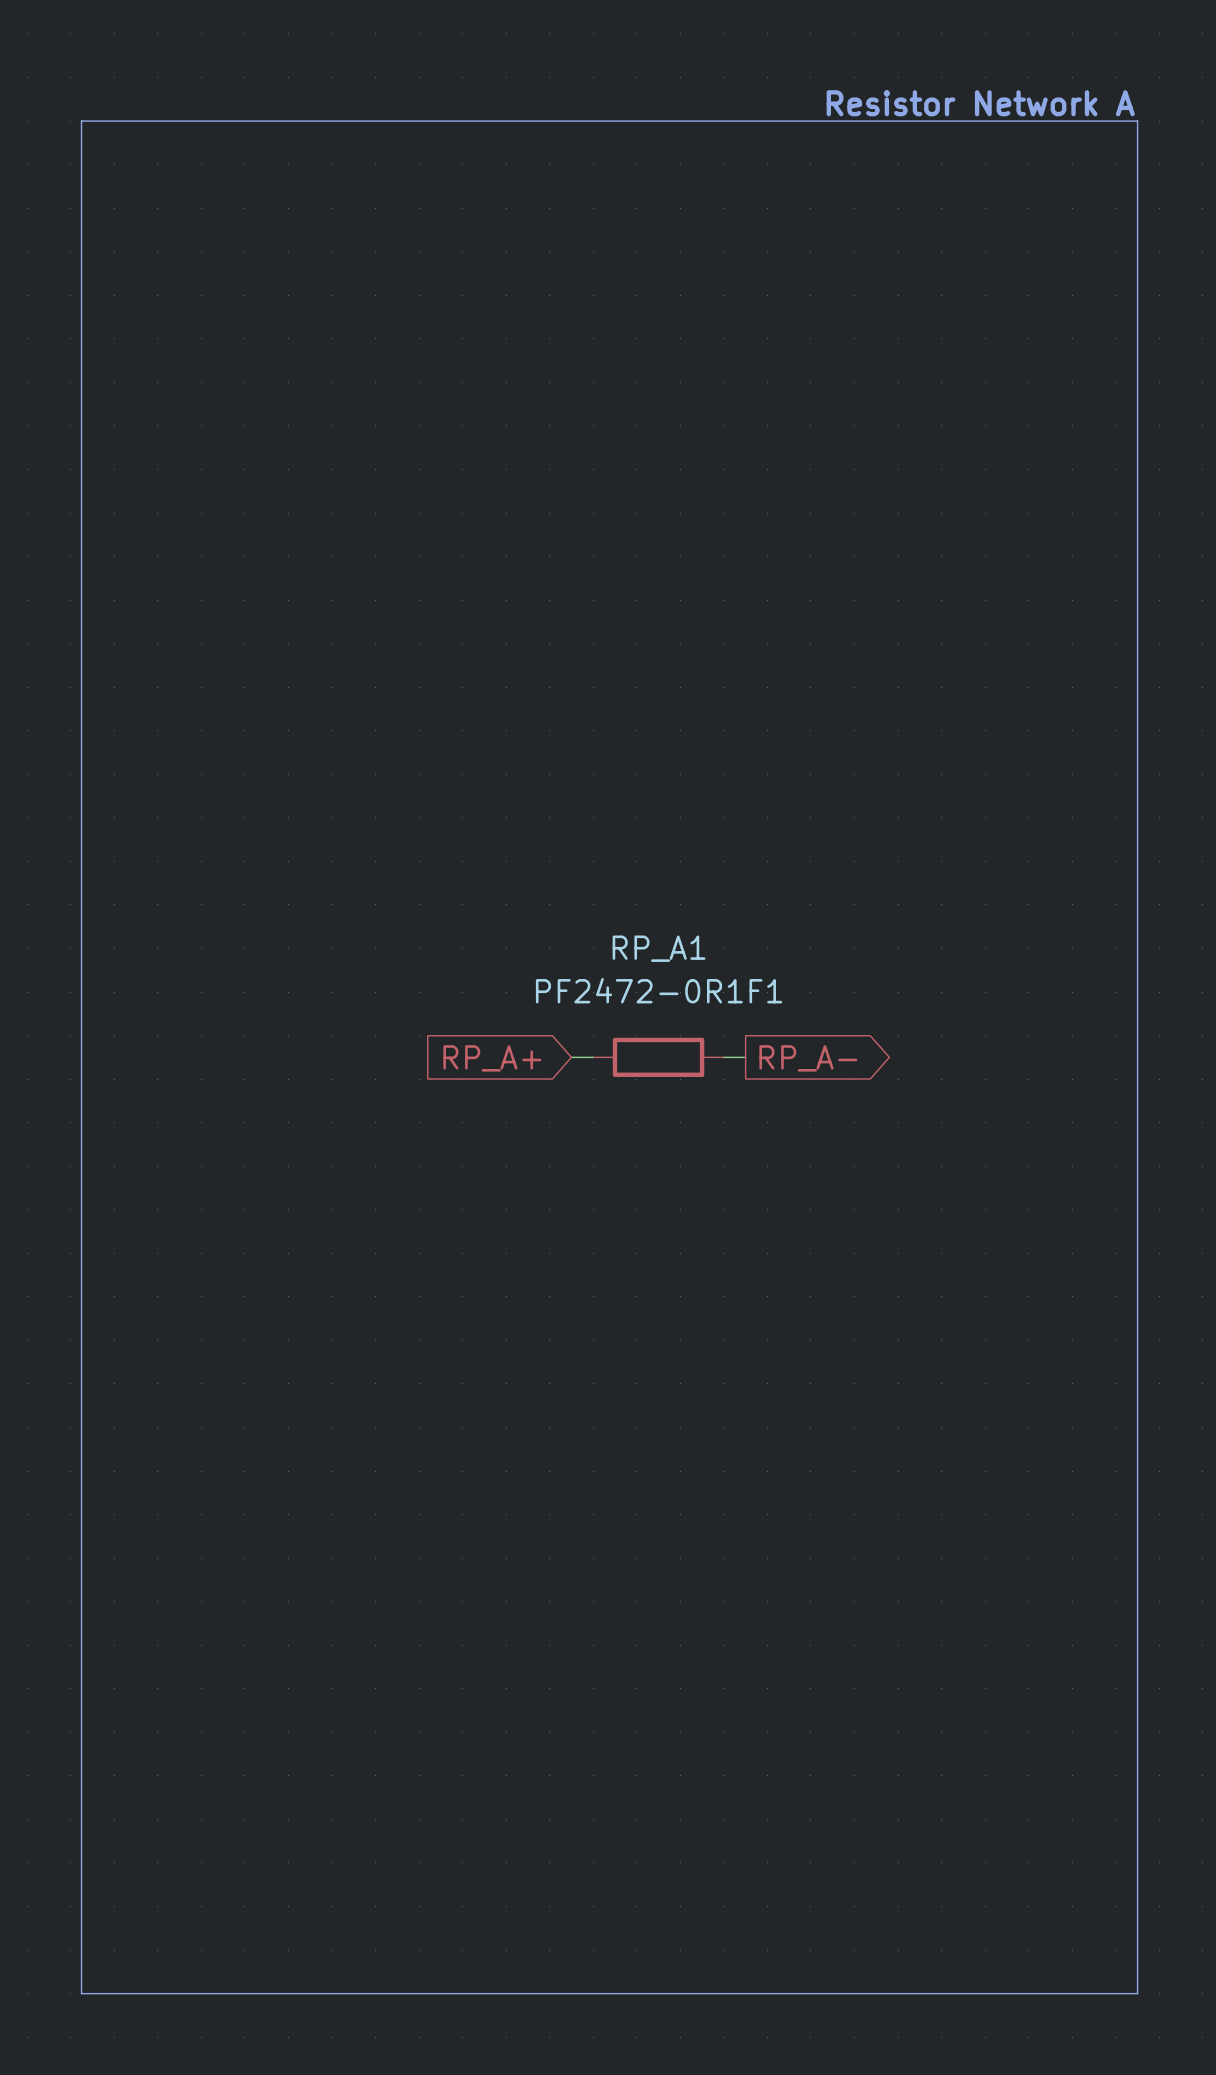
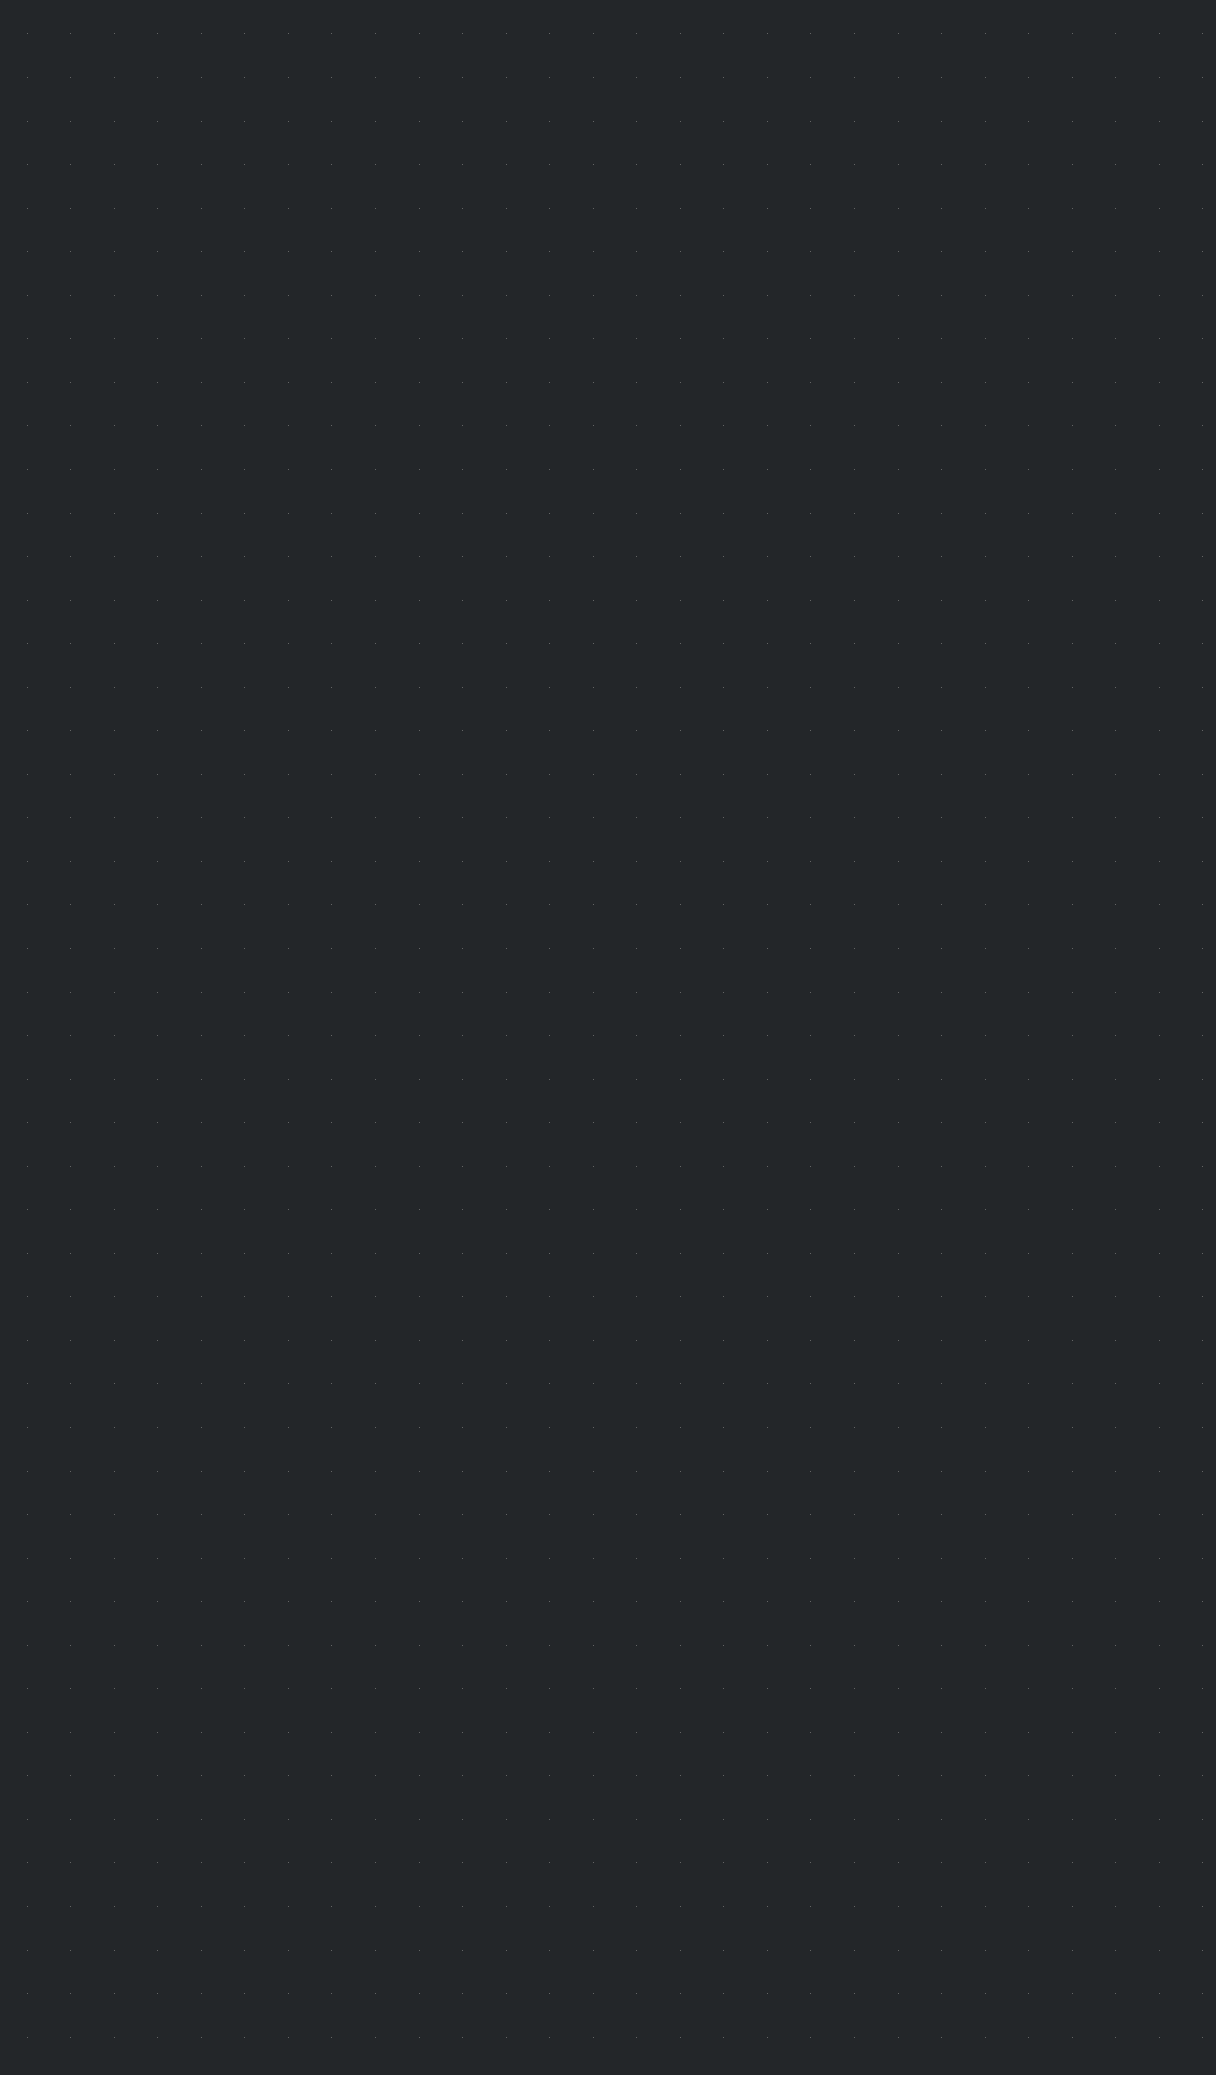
text: Resistor Network A (980, 103) -> none
line: (81, 121) (1137, 121) (1137, 1993) (81, 1993) (81, 121) -> none
wire: (571, 1057) (593, 1057) -> none
RP_A1: PF2472-0R1F1 (658, 1057) -> none
wire: (723, 1057) (745, 1057) -> none
global label: RP_A+ (492, 1058) -> none
global label: RP_A- (808, 1058) -> none

